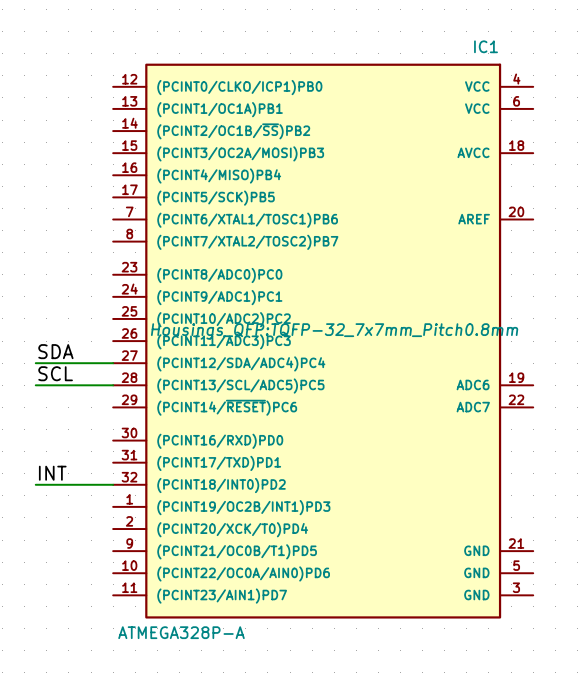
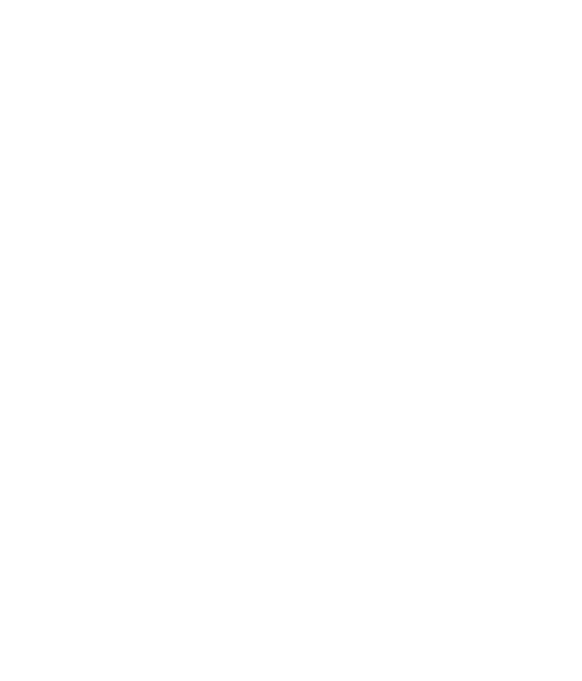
IC1: ATMEGA328P-A (323, 341) -> none
label: SDA (55, 351) -> none
wire: (35, 363) (113, 363) -> none
label: SCL (55, 373) -> none
wire: (35, 385) (113, 385) -> none
label: INT (52, 473) -> none
wire: (35, 484) (113, 484) -> none

